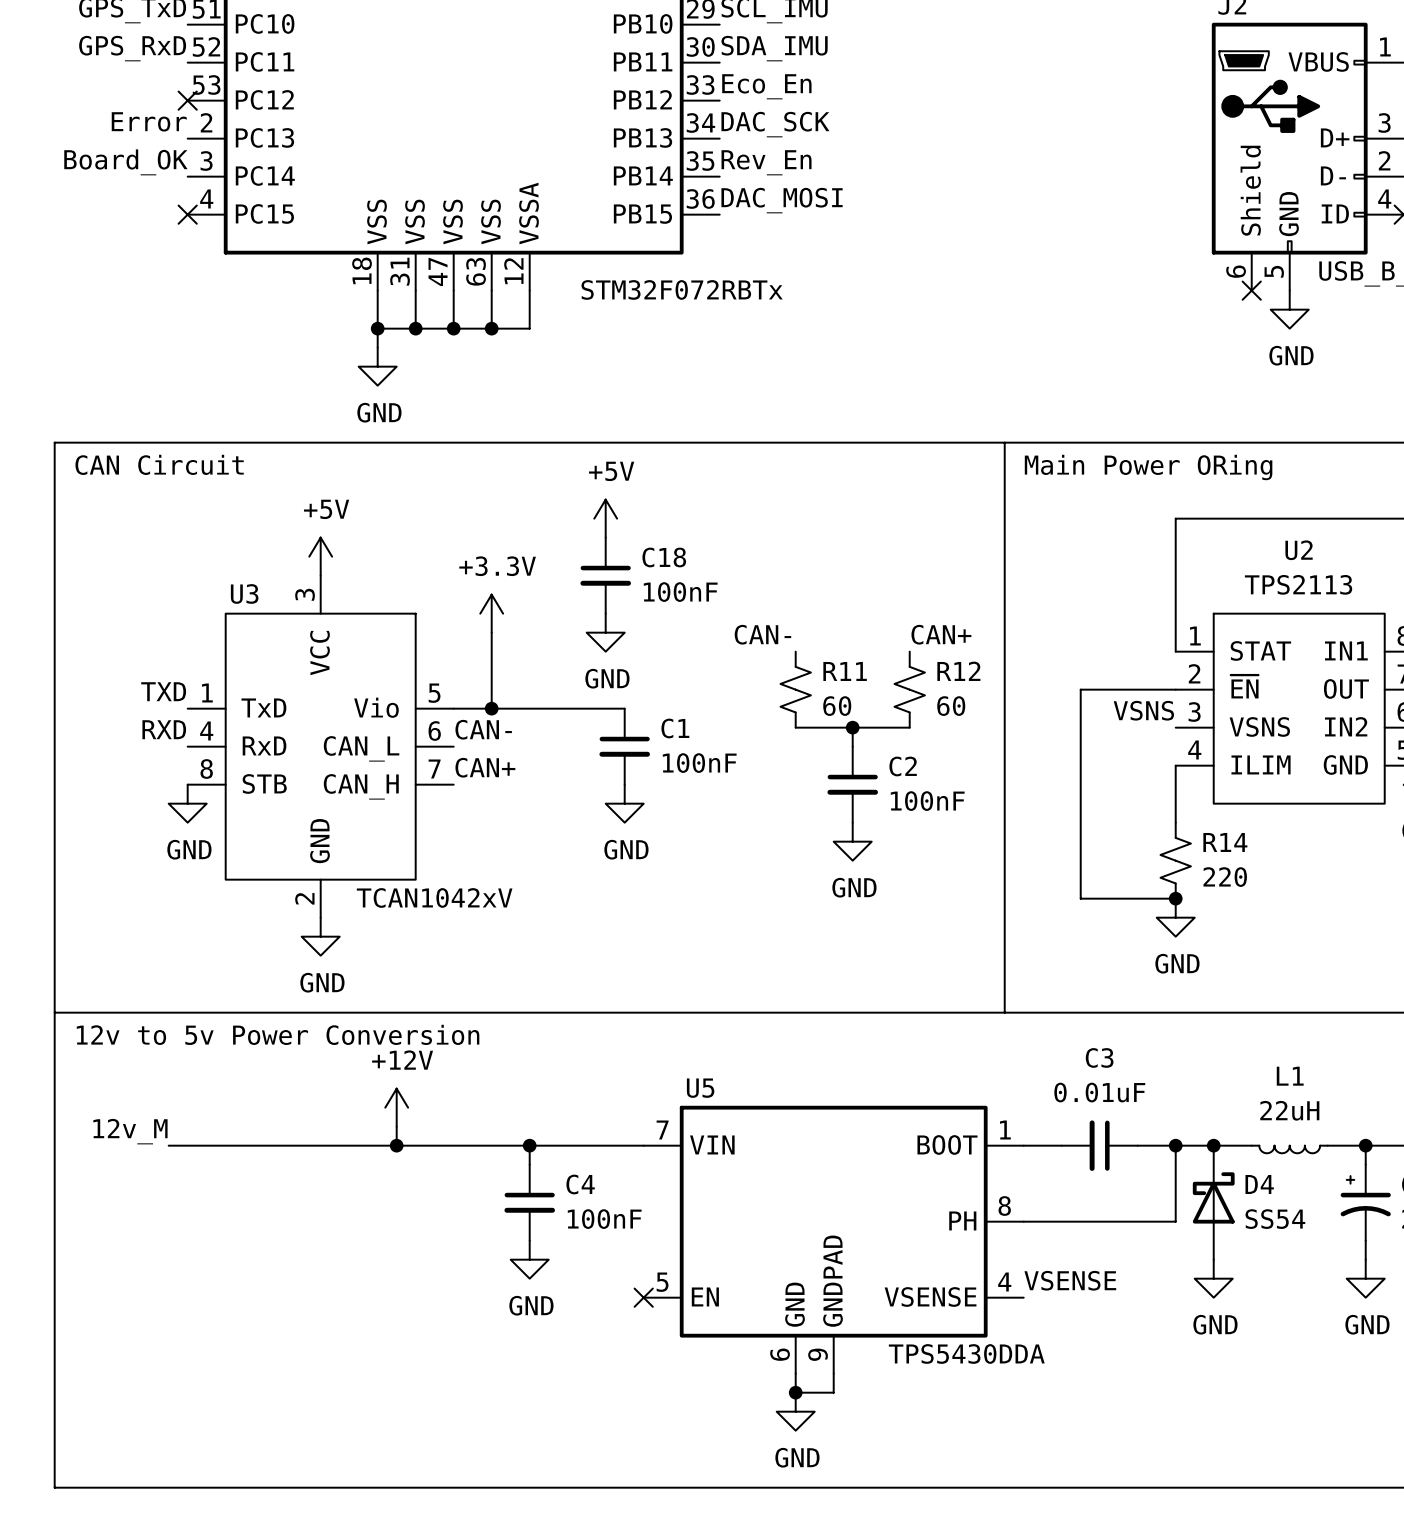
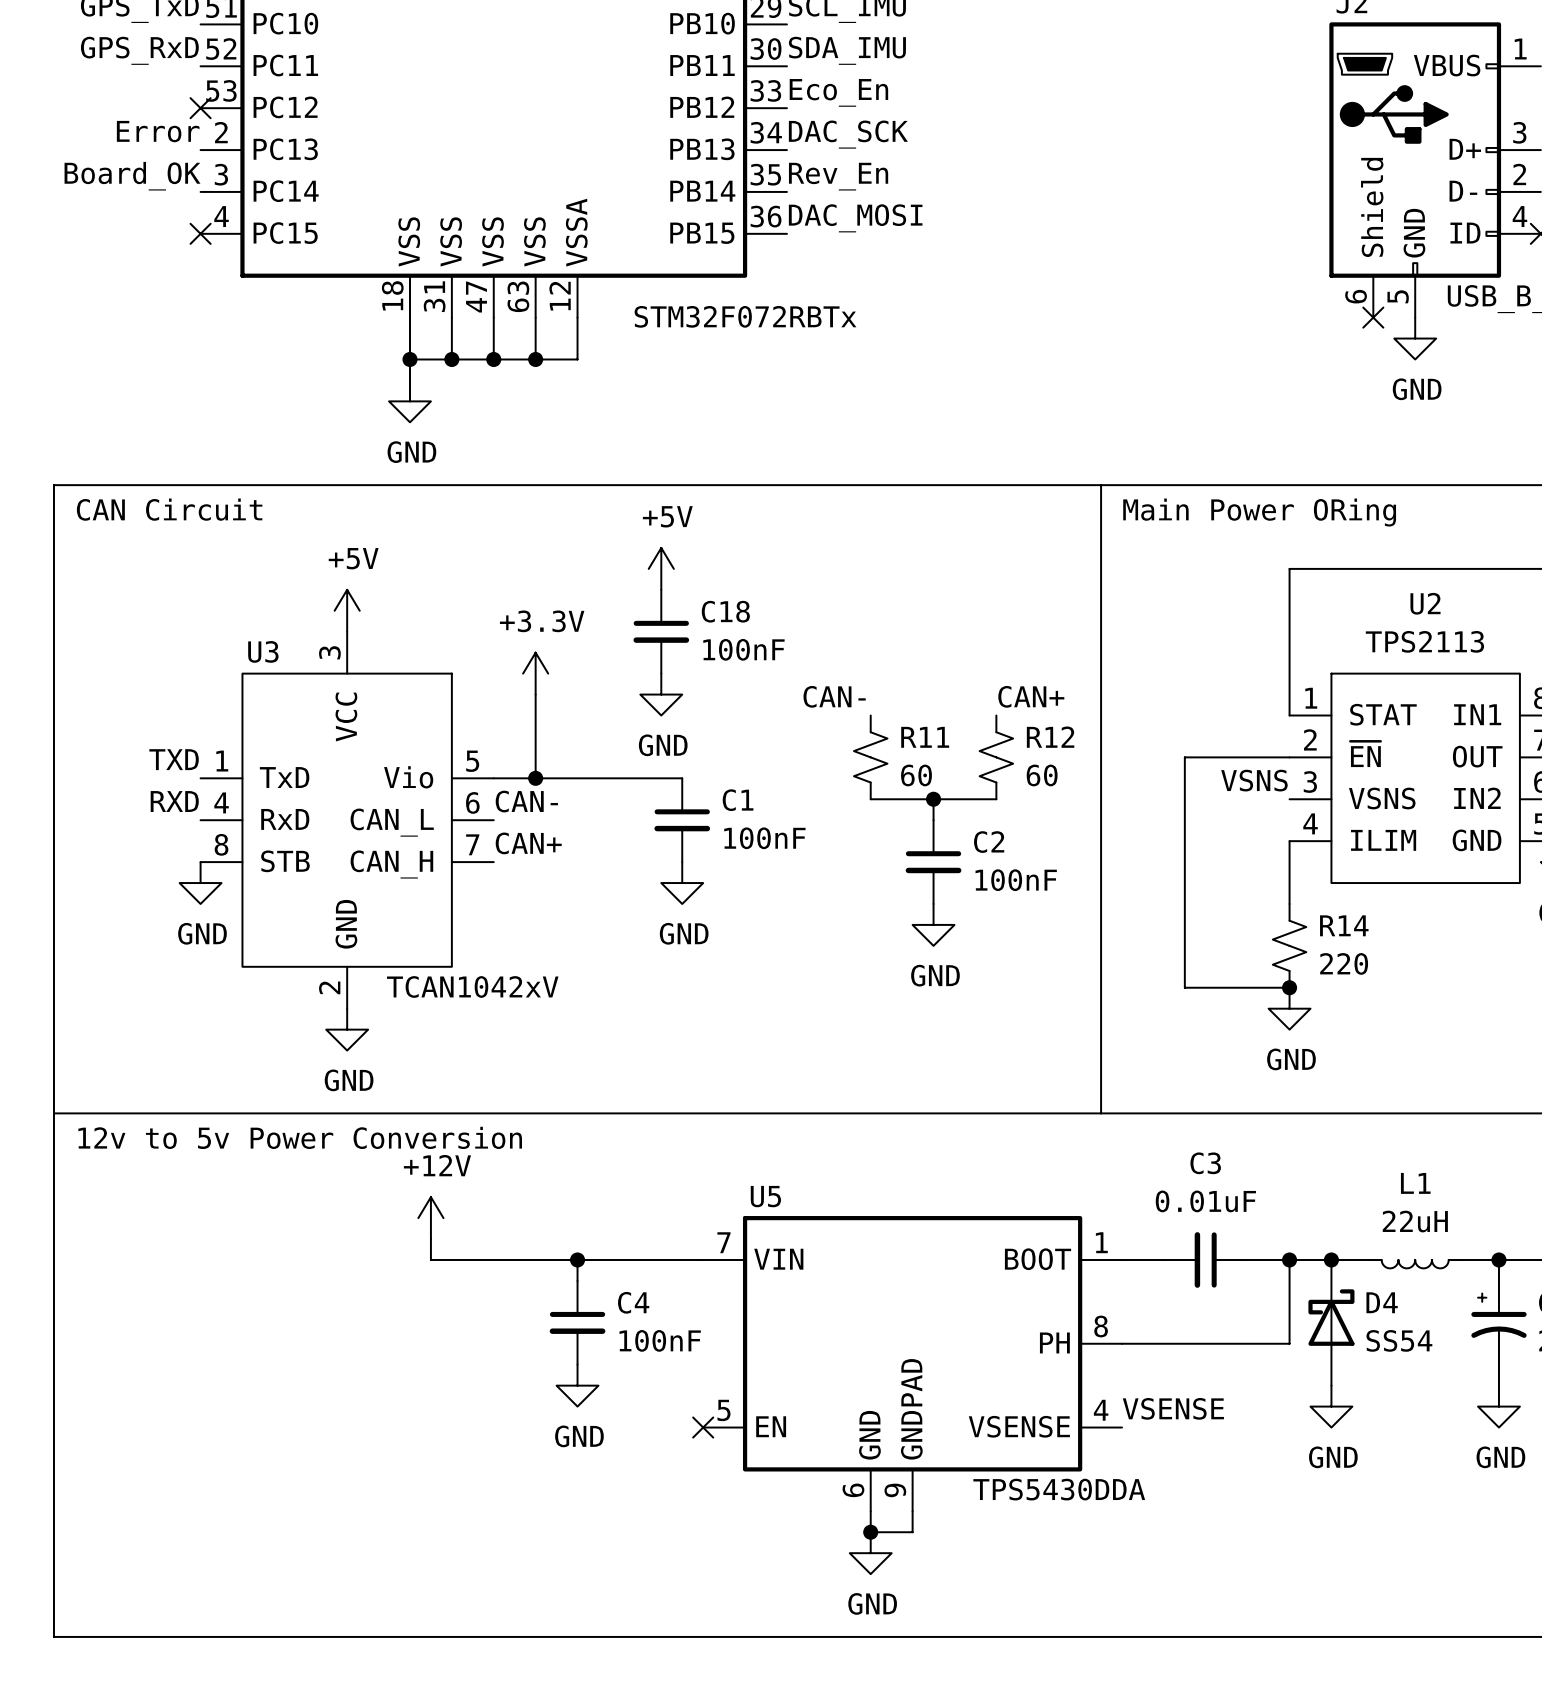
label: 12v_M (130, 1131) -> none
wire: (168, 1145) (396, 1145) -> none
junction: (396, 1145) -> none

